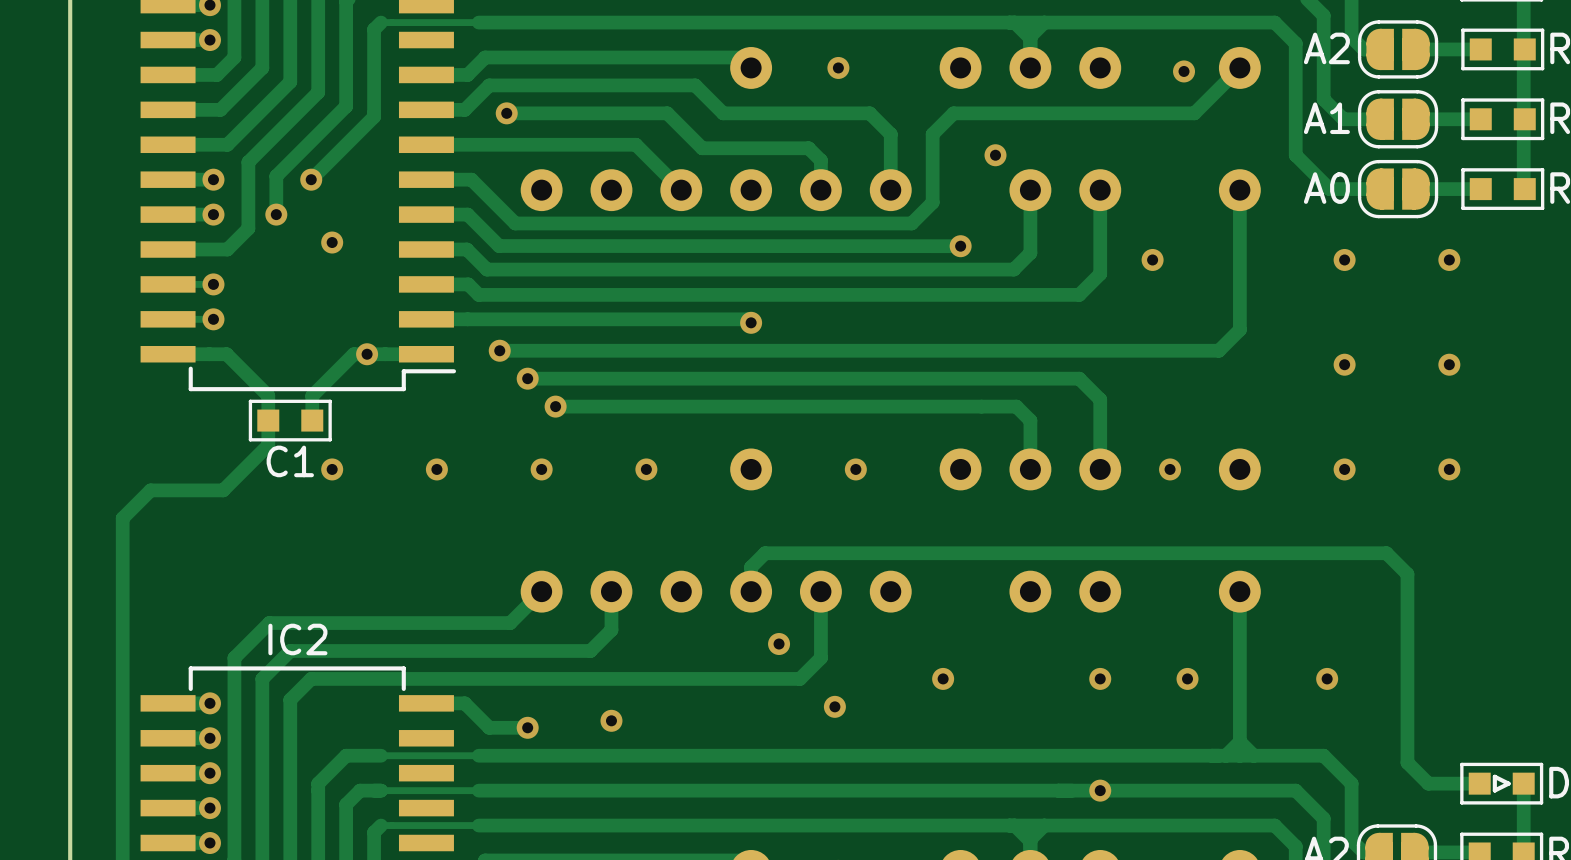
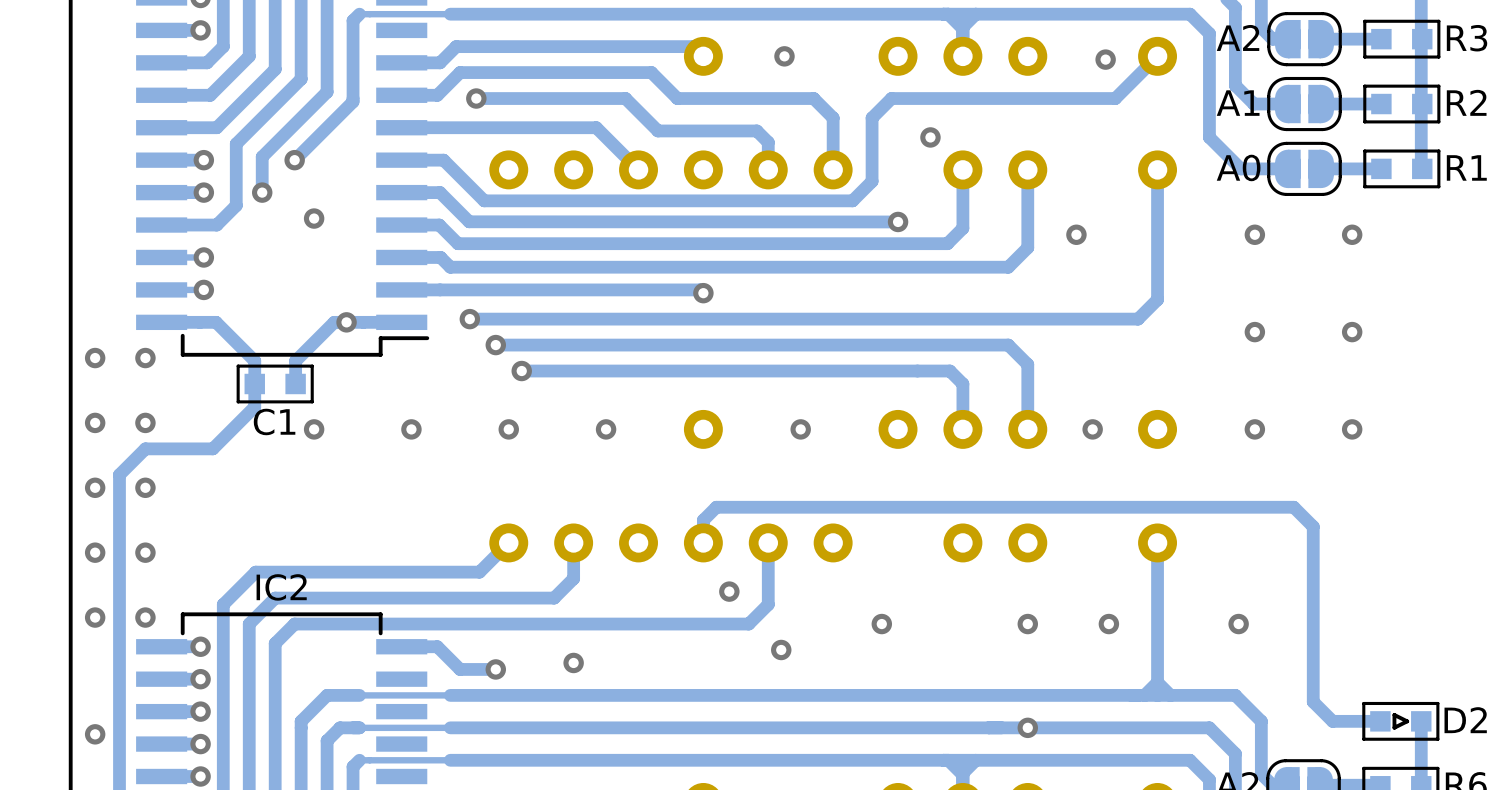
via: none -> (95, 358)
via: none -> (145, 358)
via: none -> (95, 422)
via: none -> (145, 422)
via: none -> (95, 487)
via: none -> (145, 487)
via: none -> (95, 552)
via: none -> (145, 552)
via: none -> (95, 617)
via: none -> (145, 617)
via: none -> (95, 734)

